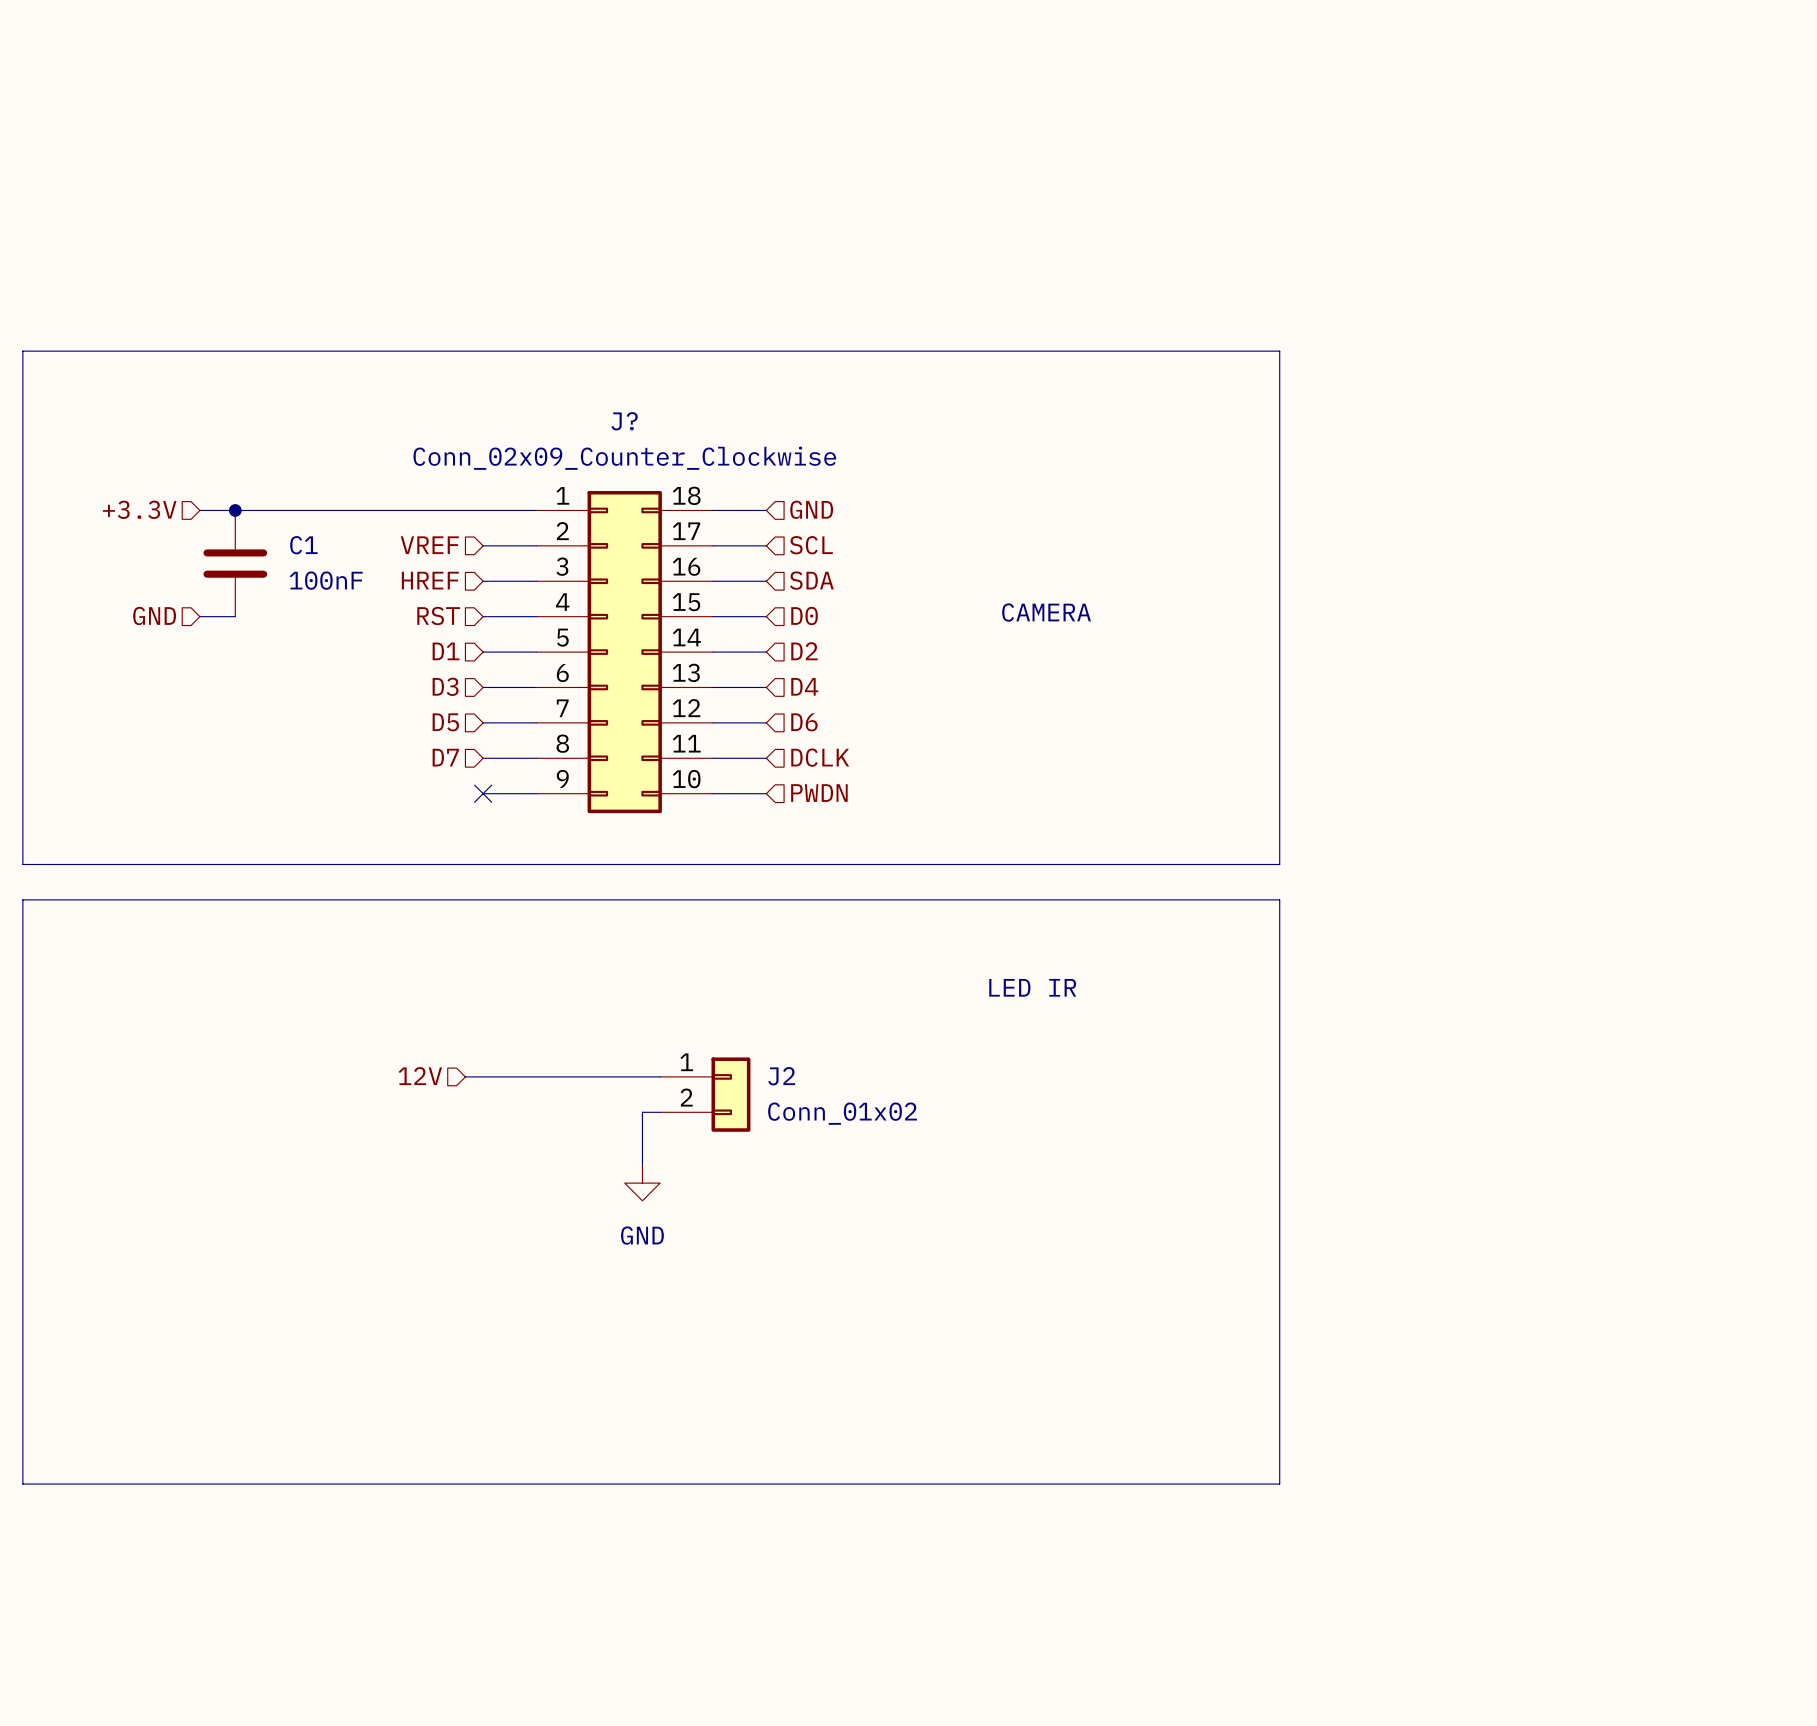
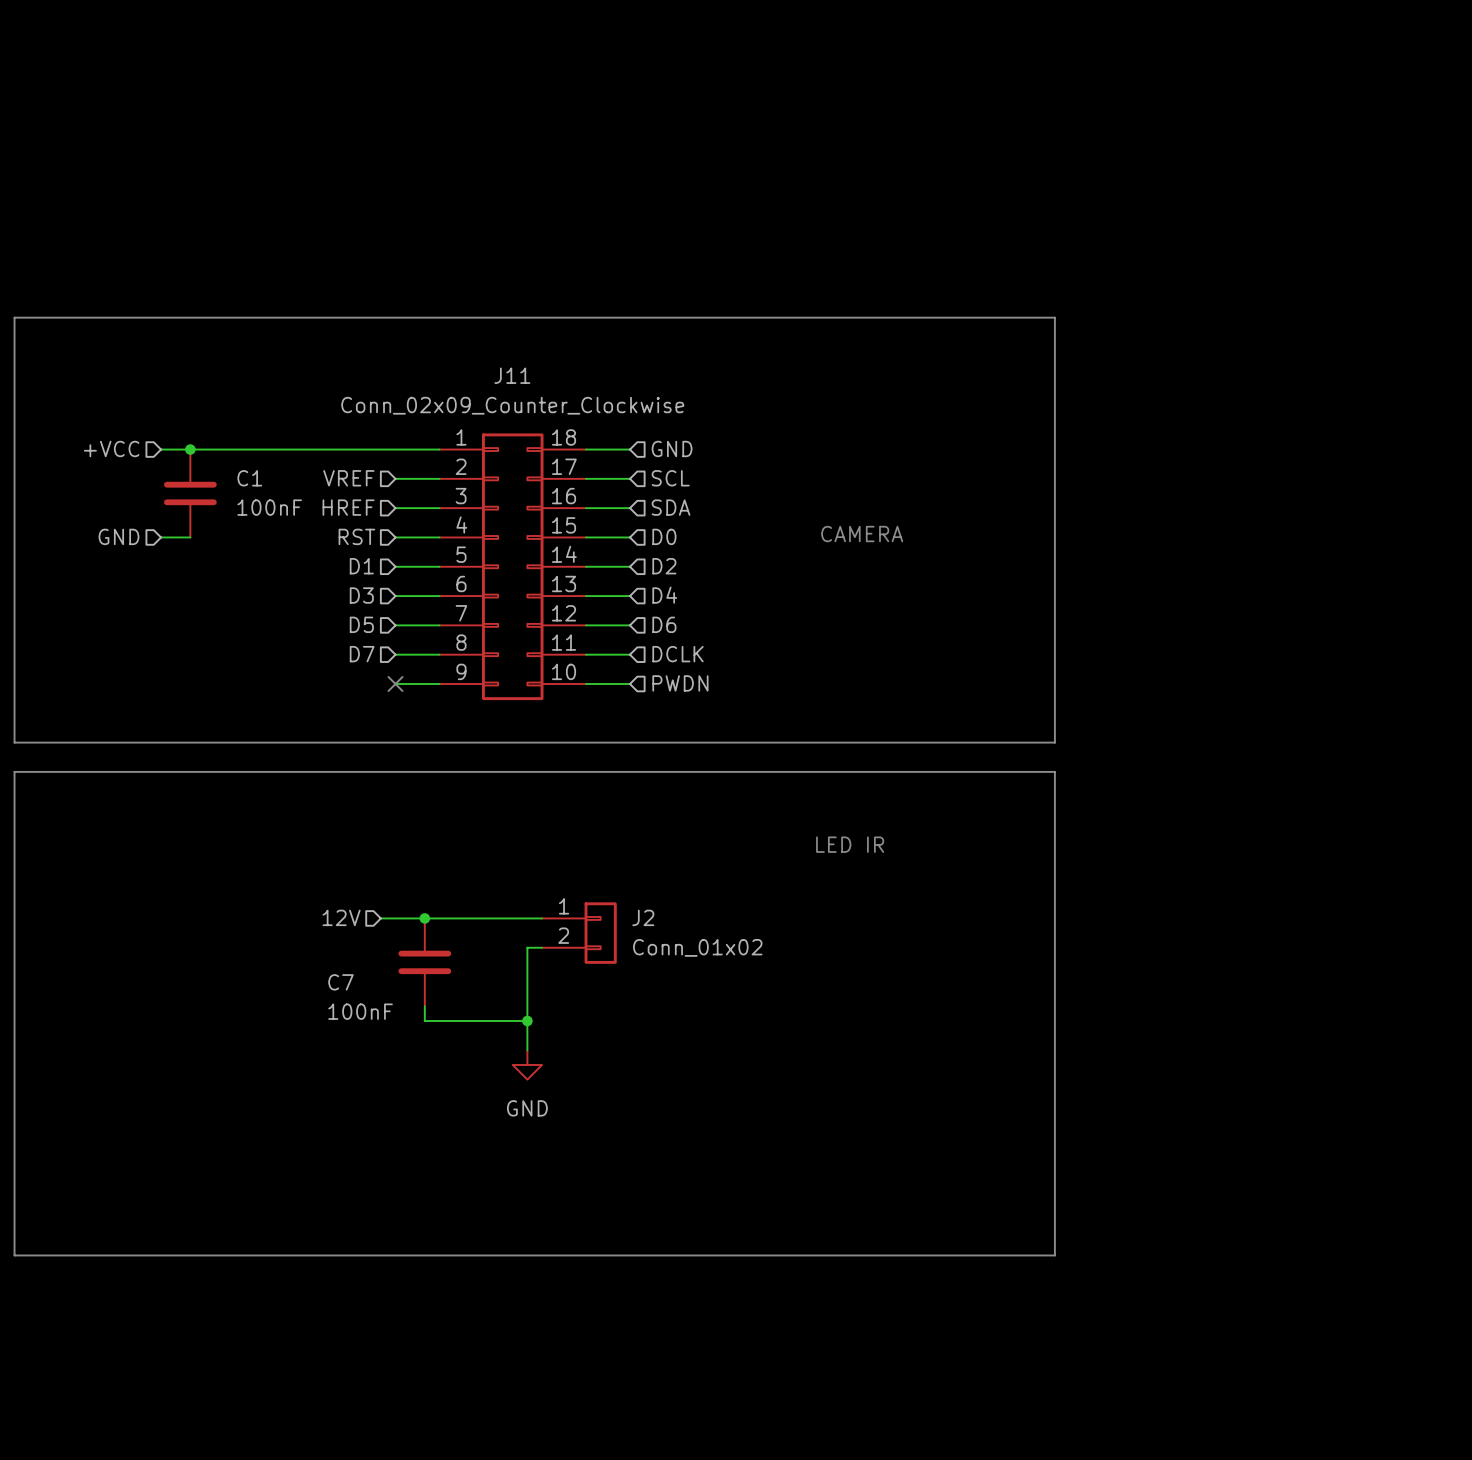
J? name: J? (624, 421) -> J11 (512, 375)
hierarchical label: +3.3V (139, 509) -> +VCC (111, 448)
junction: none -> (424, 918)
C7: none -> 100nF (424, 962)
wire: none -> (527, 991) (527, 1050)
wire: none -> (424, 1006) (424, 1021) (527, 1021)
power symbol position: GND (642, 1183) -> GND (527, 1064)
junction: none -> (527, 1021)

